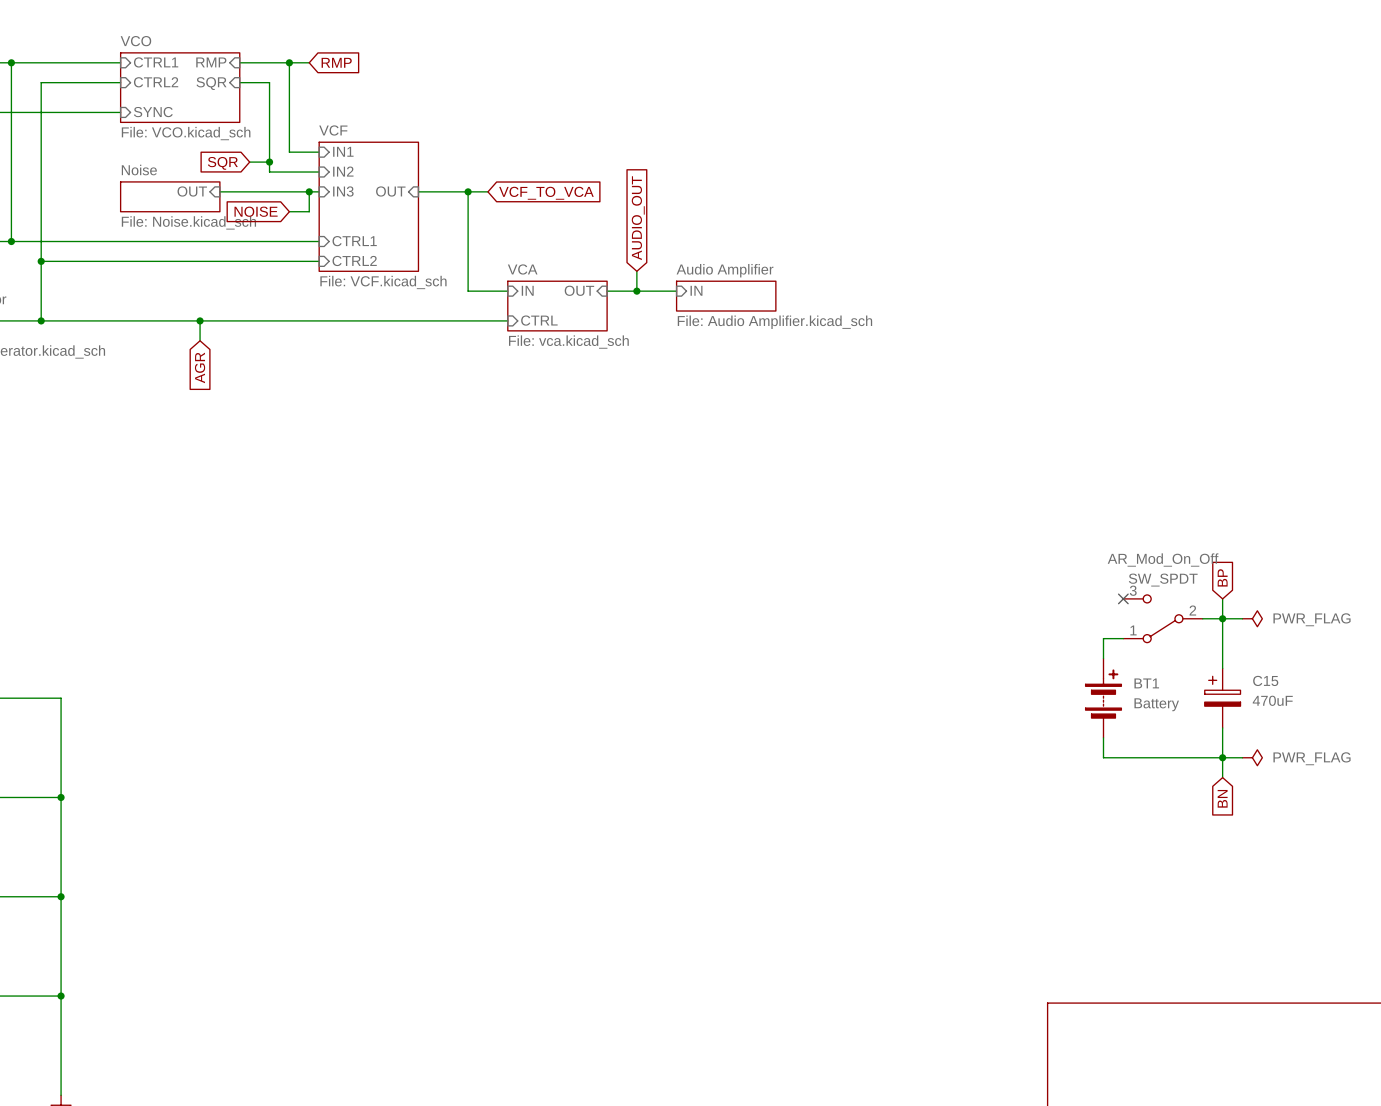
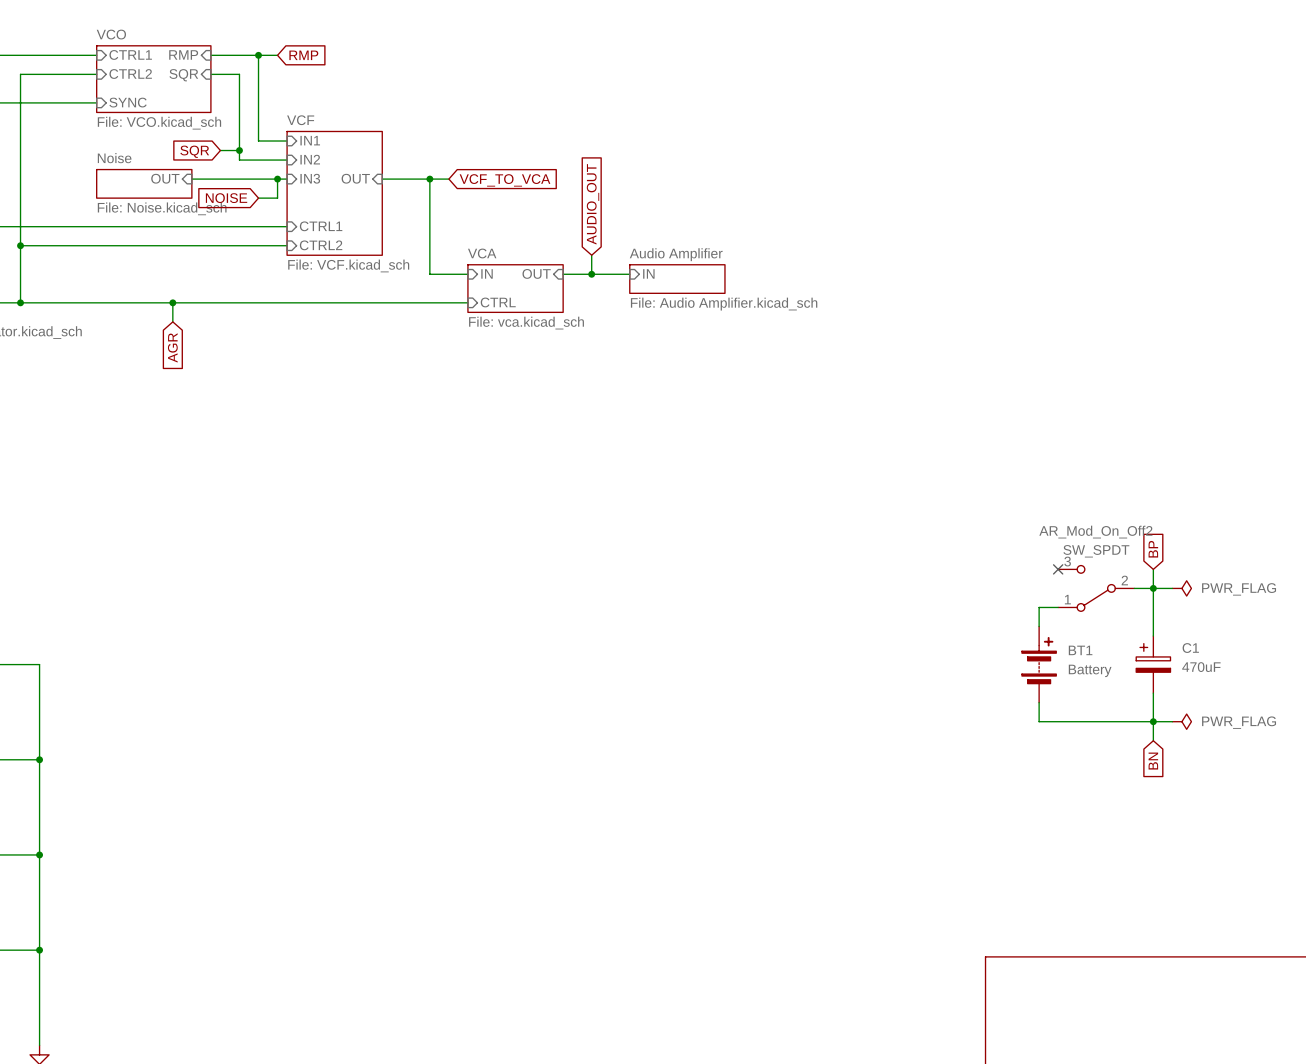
AR_Mod_On_Off name: AR_Mod_On_Off (1163, 560) -> AR_Mod_On_Off2 (1095, 532)
C15 name: C15 (1265, 680) -> C1 (1190, 648)

